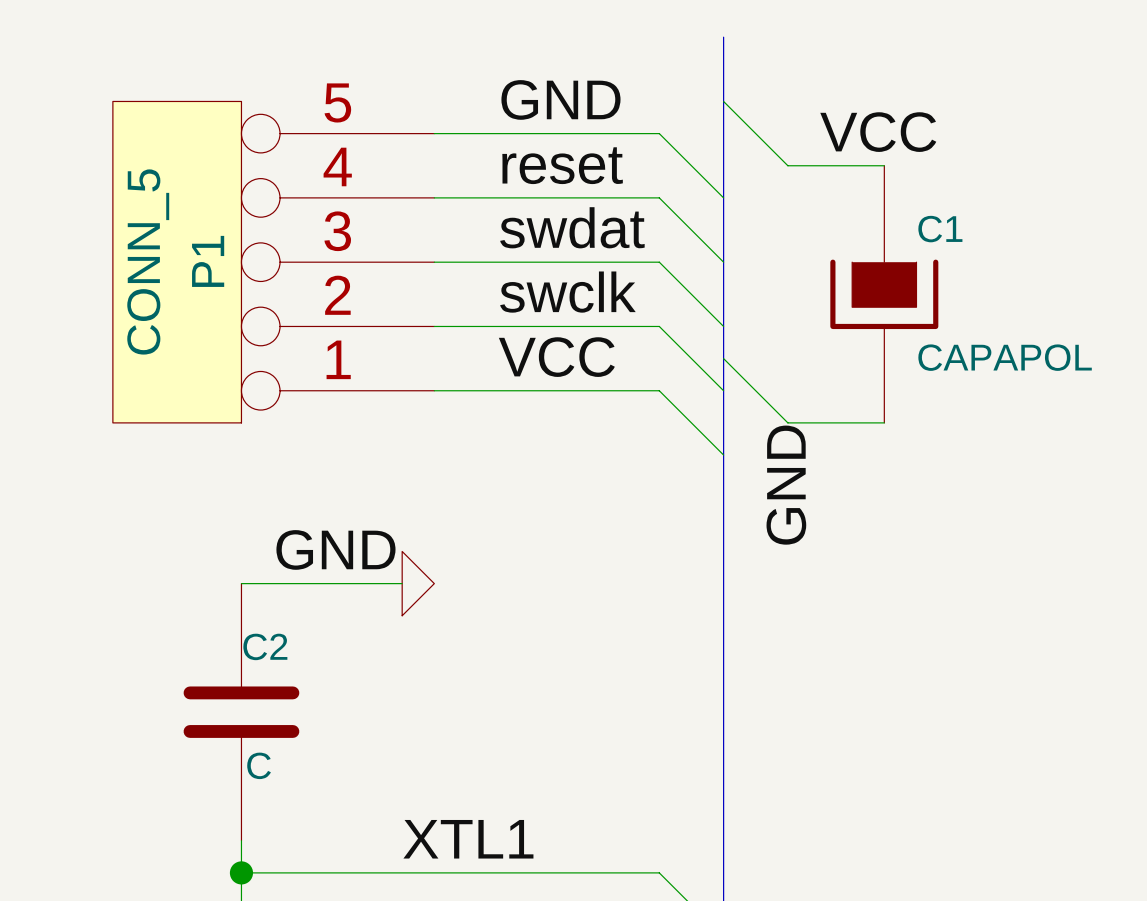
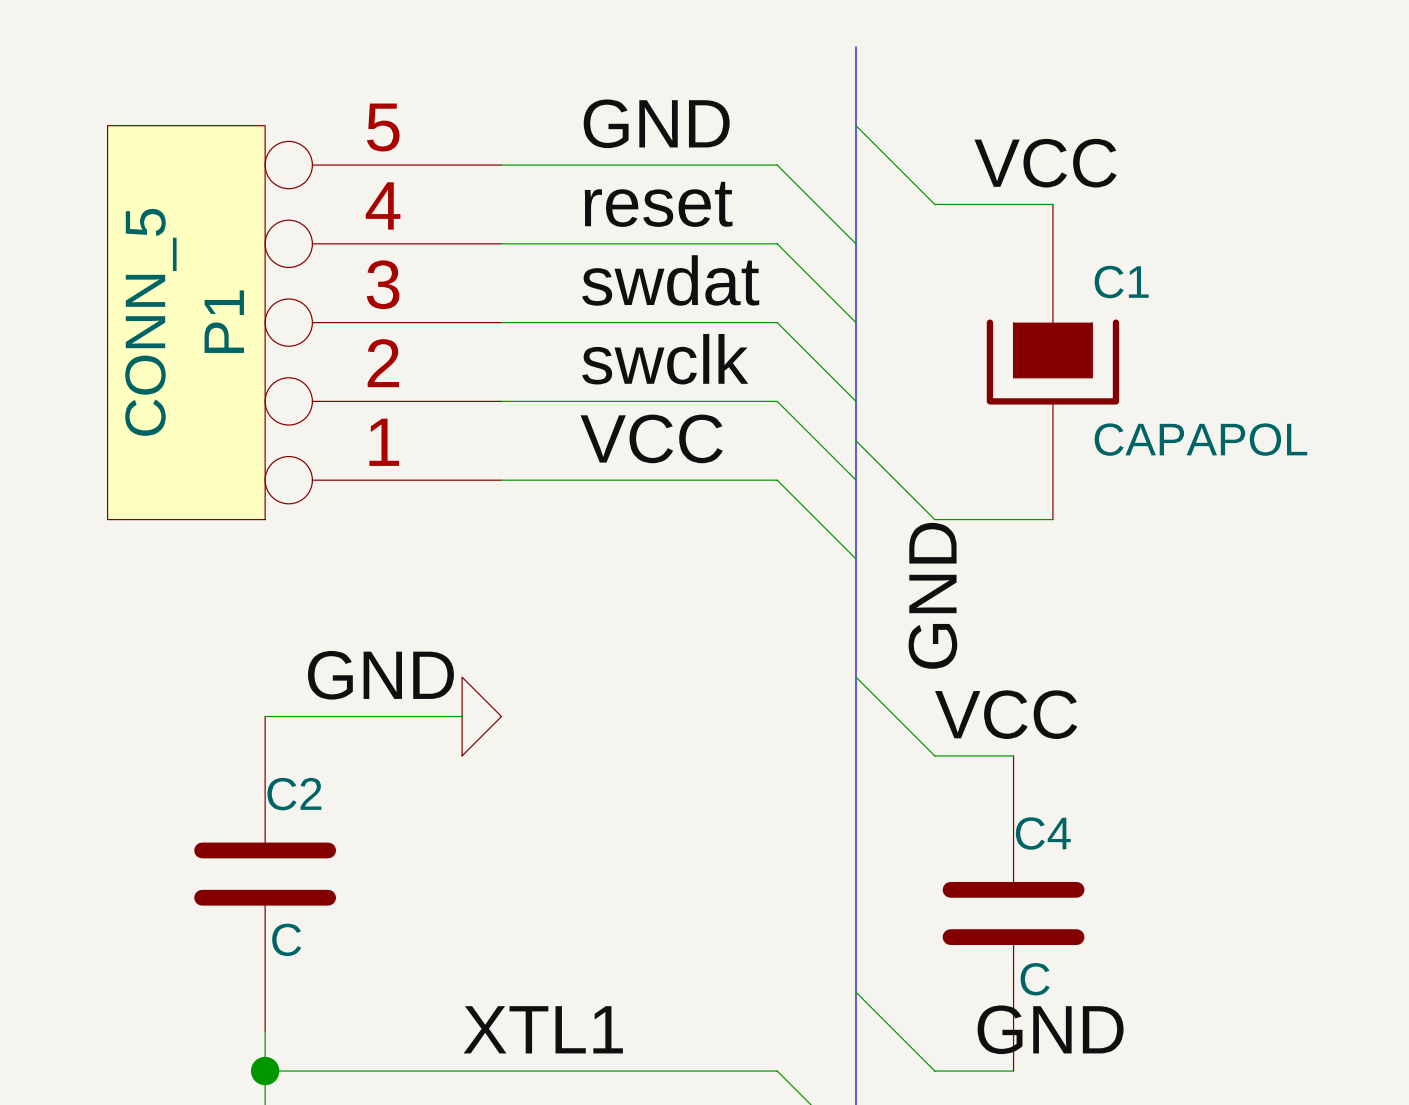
wire: none -> (855, 677) (934, 755) (1013, 755)
label: none -> VCC (1006, 714)
C4: none -> C (1013, 913)
wire: none -> (855, 992) (934, 1071) (1013, 1071)
label: none -> GND (1050, 1029)

